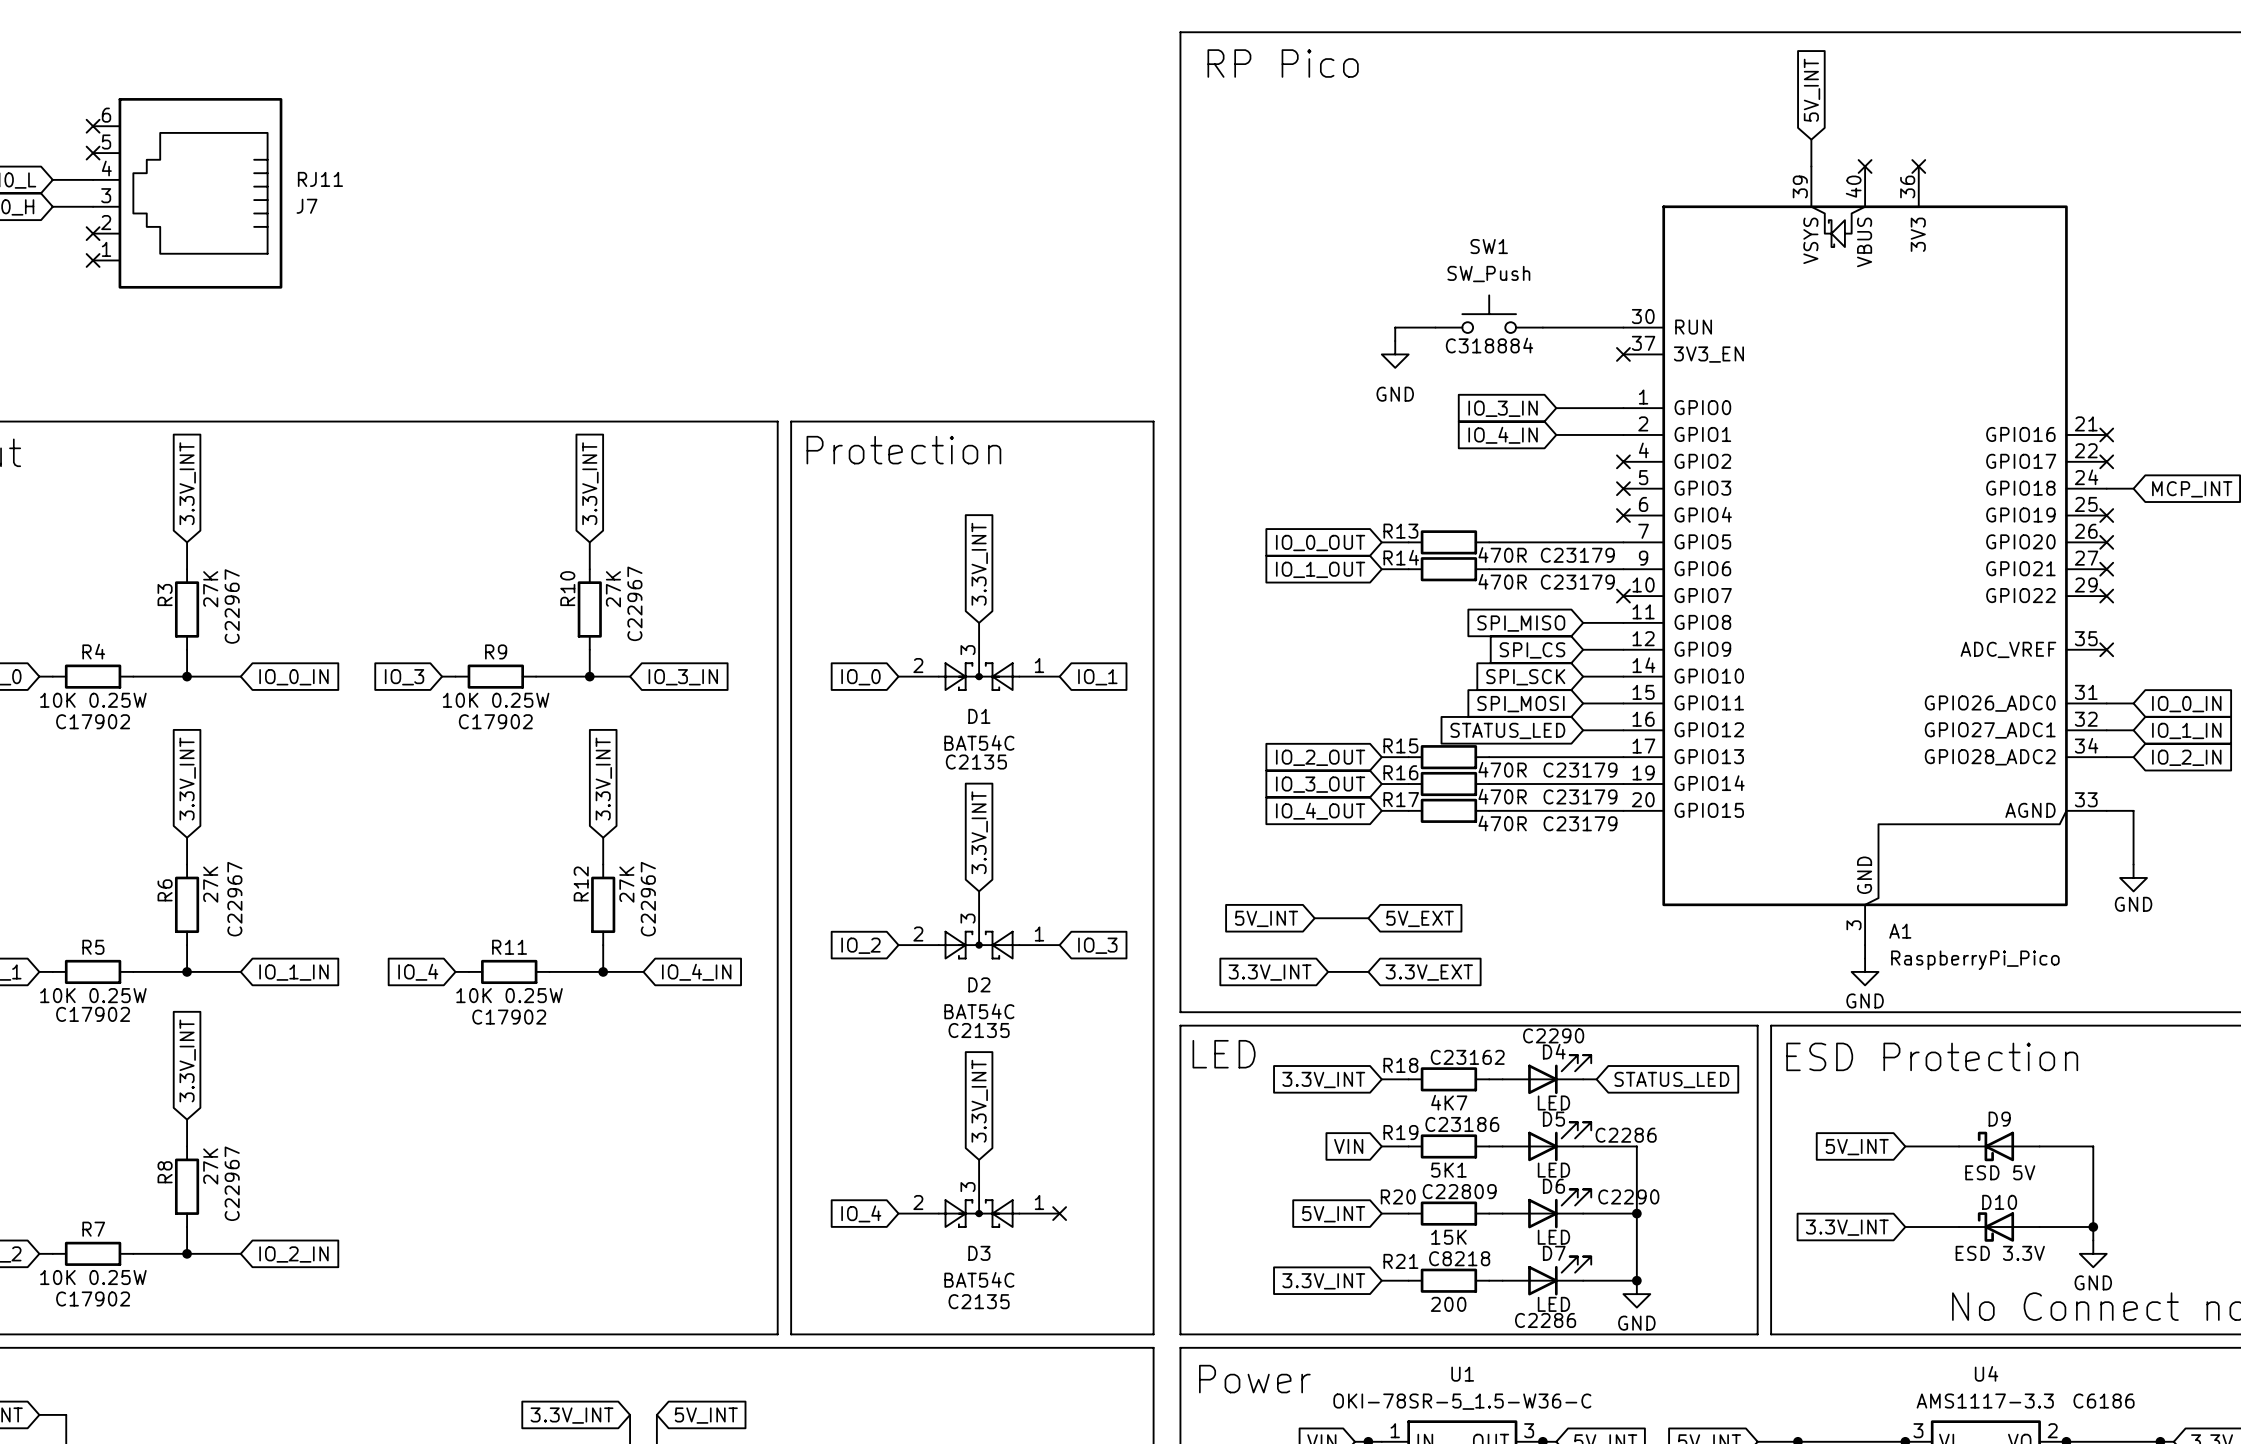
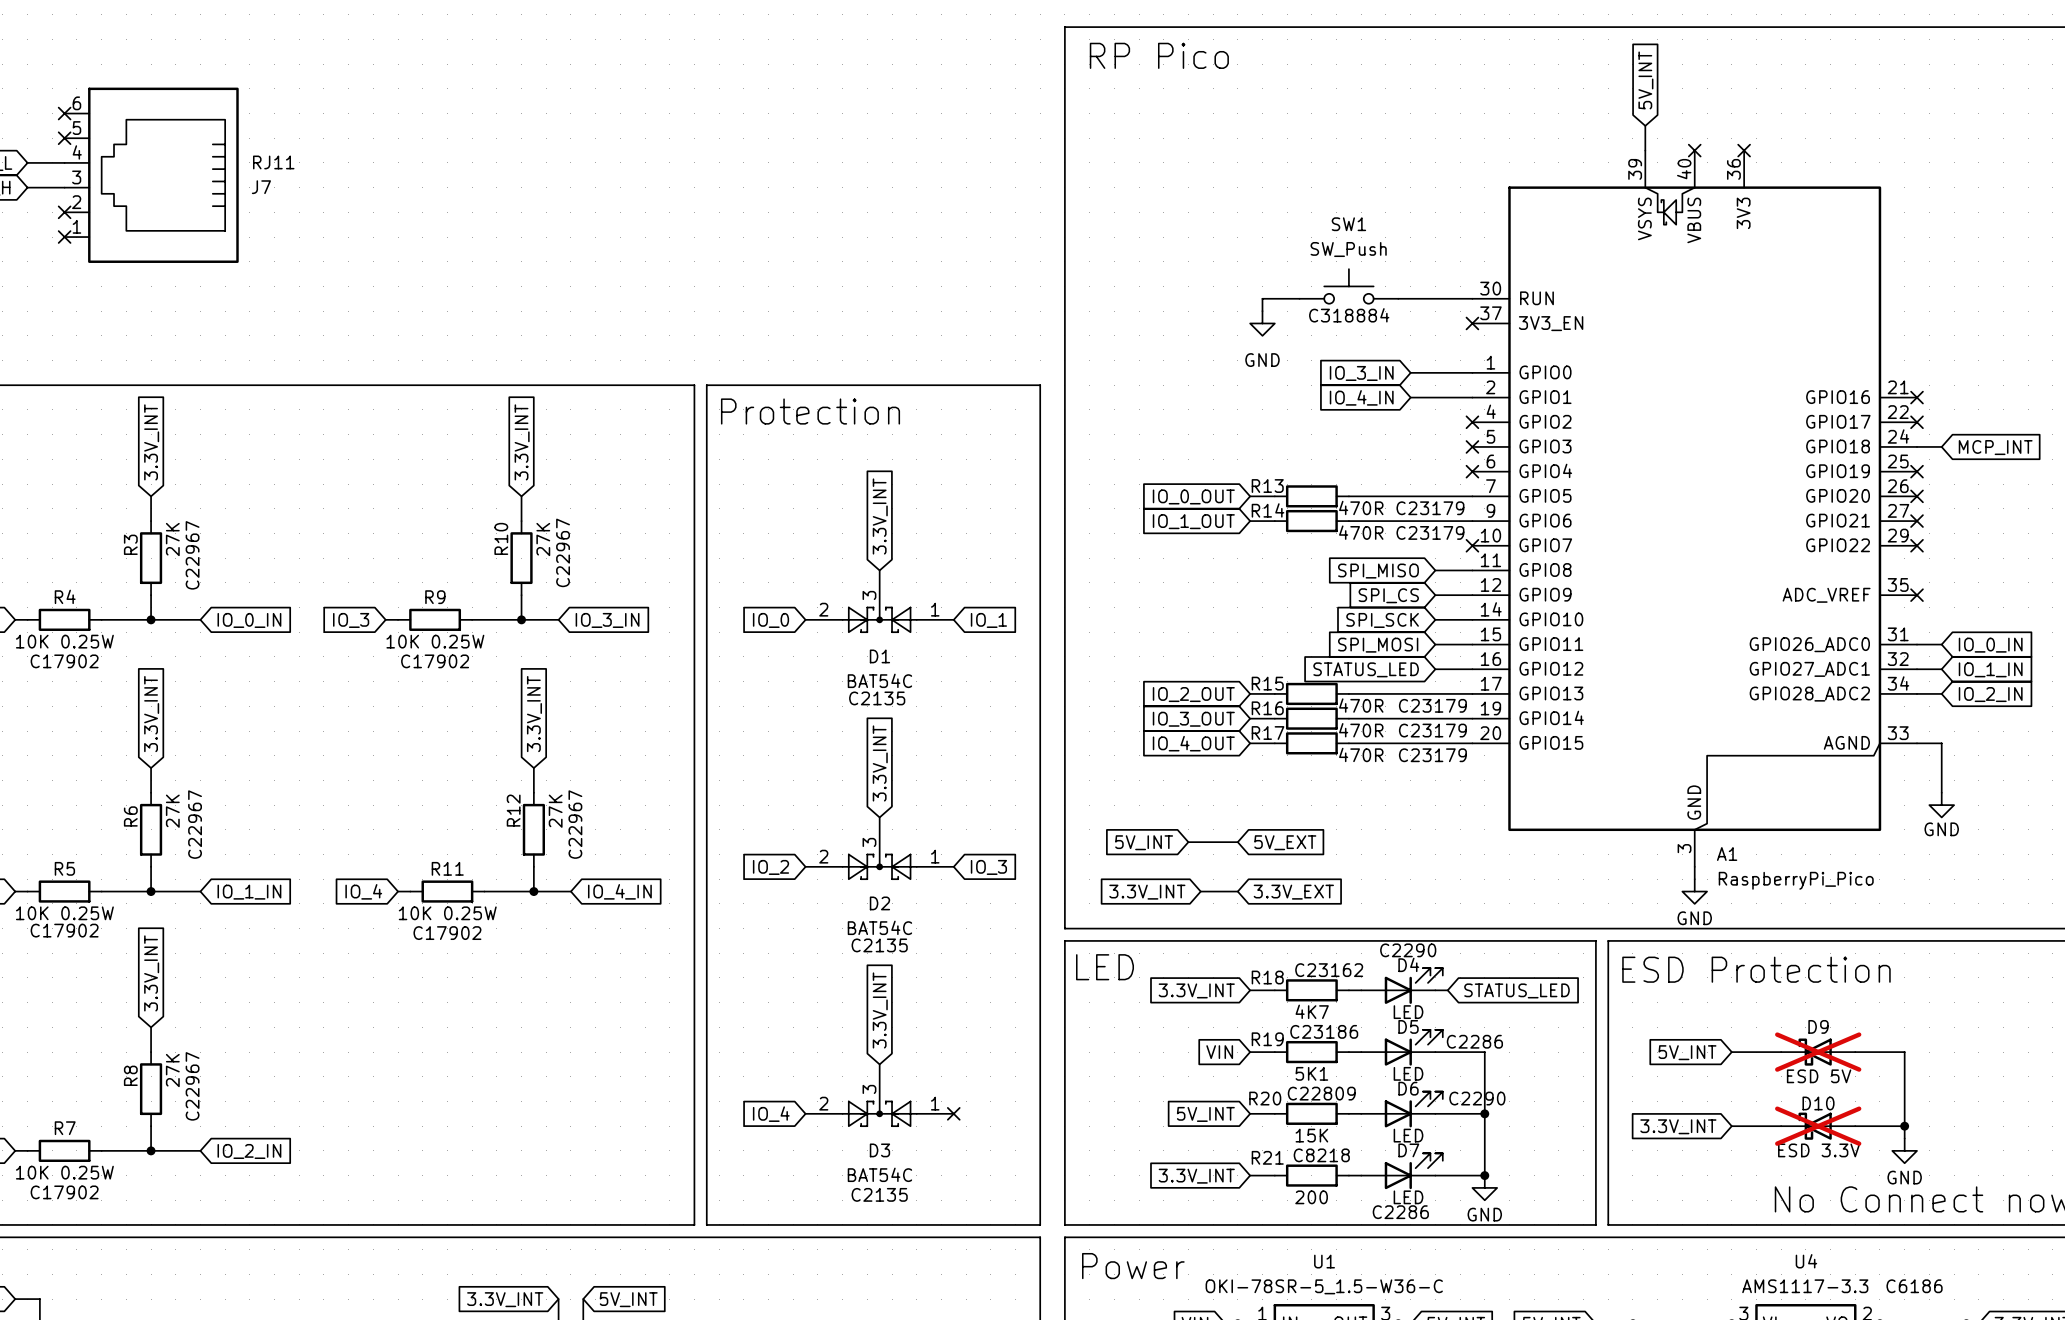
D9 do-not-place cross: none -> (1818, 1052)
D10 do-not-place cross: none -> (1818, 1126)

